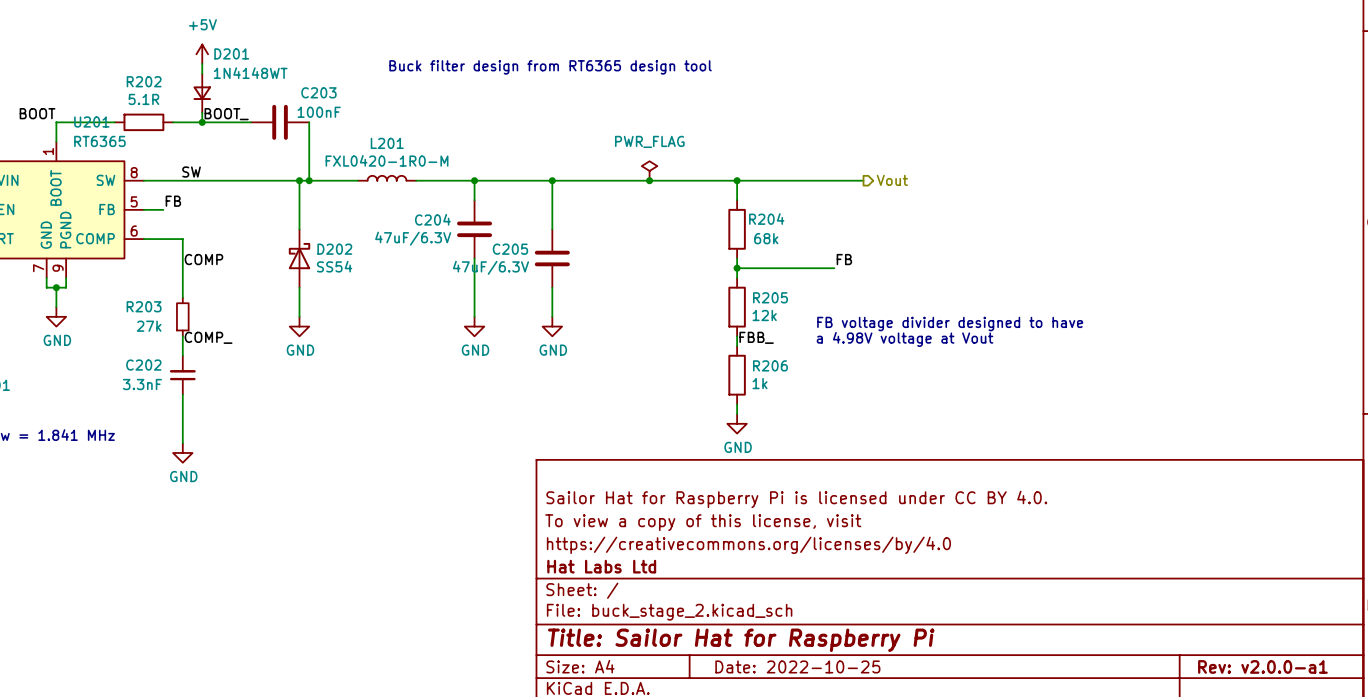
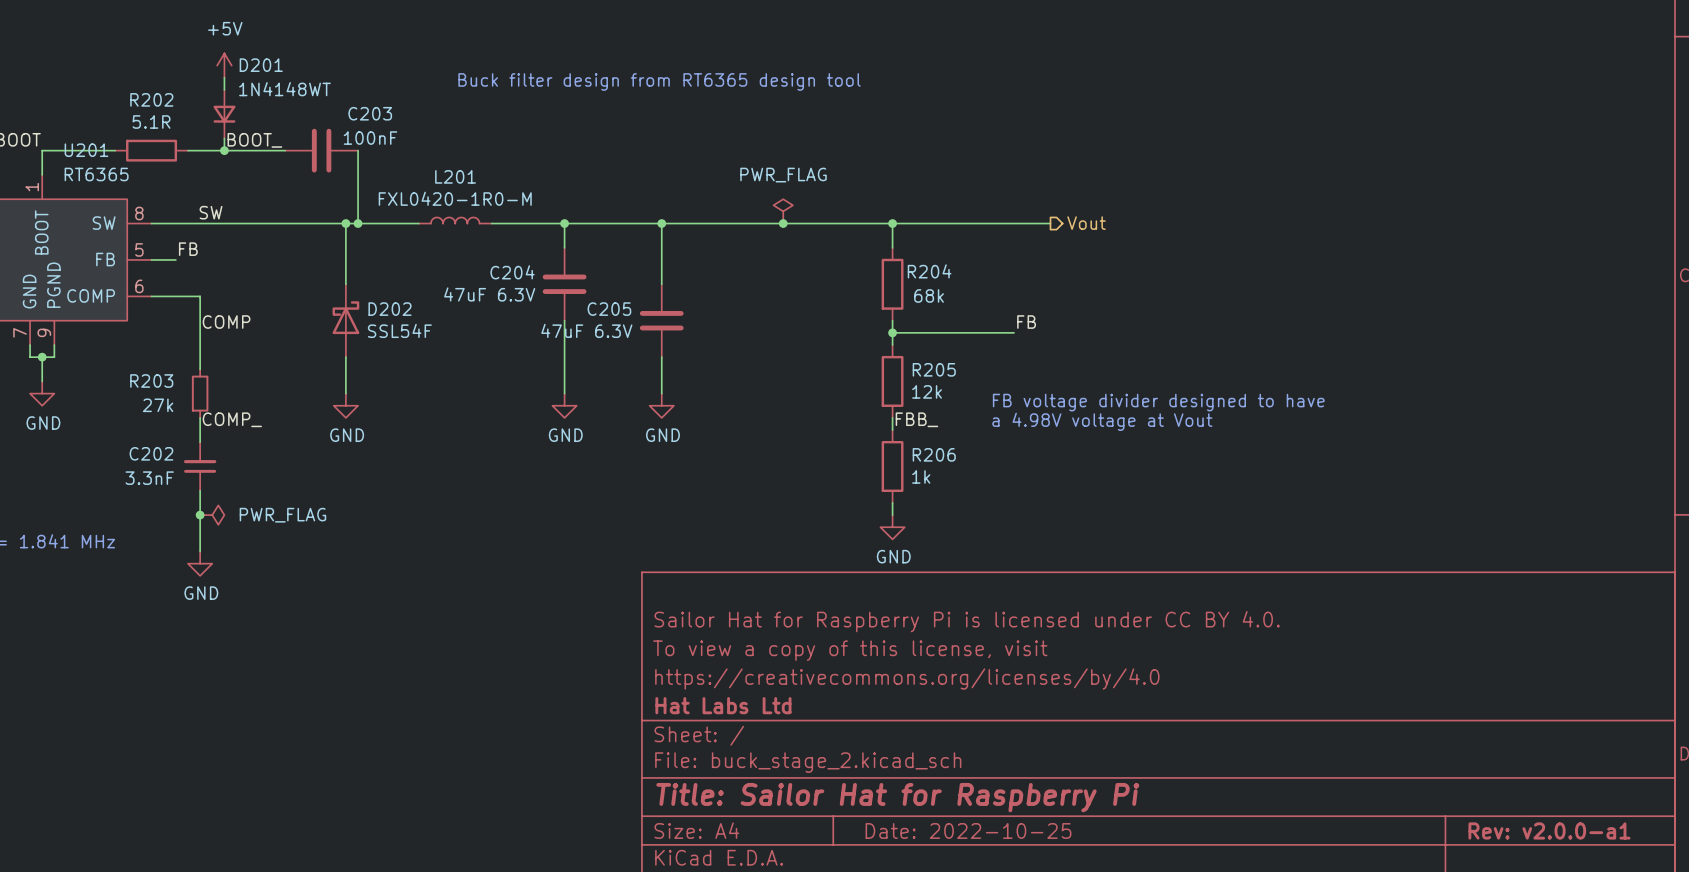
C204 value: 47uF/6.3V (413, 238) -> 47uF 6.3V (489, 294)
D202 value: SS54 (334, 266) -> SSL54F (399, 330)
C205 value: 47uF/6.3V (490, 267) -> 47uF 6.3V (586, 330)
junction: none -> (200, 515)
power symbol: none -> PWR_FLAG (212, 515)

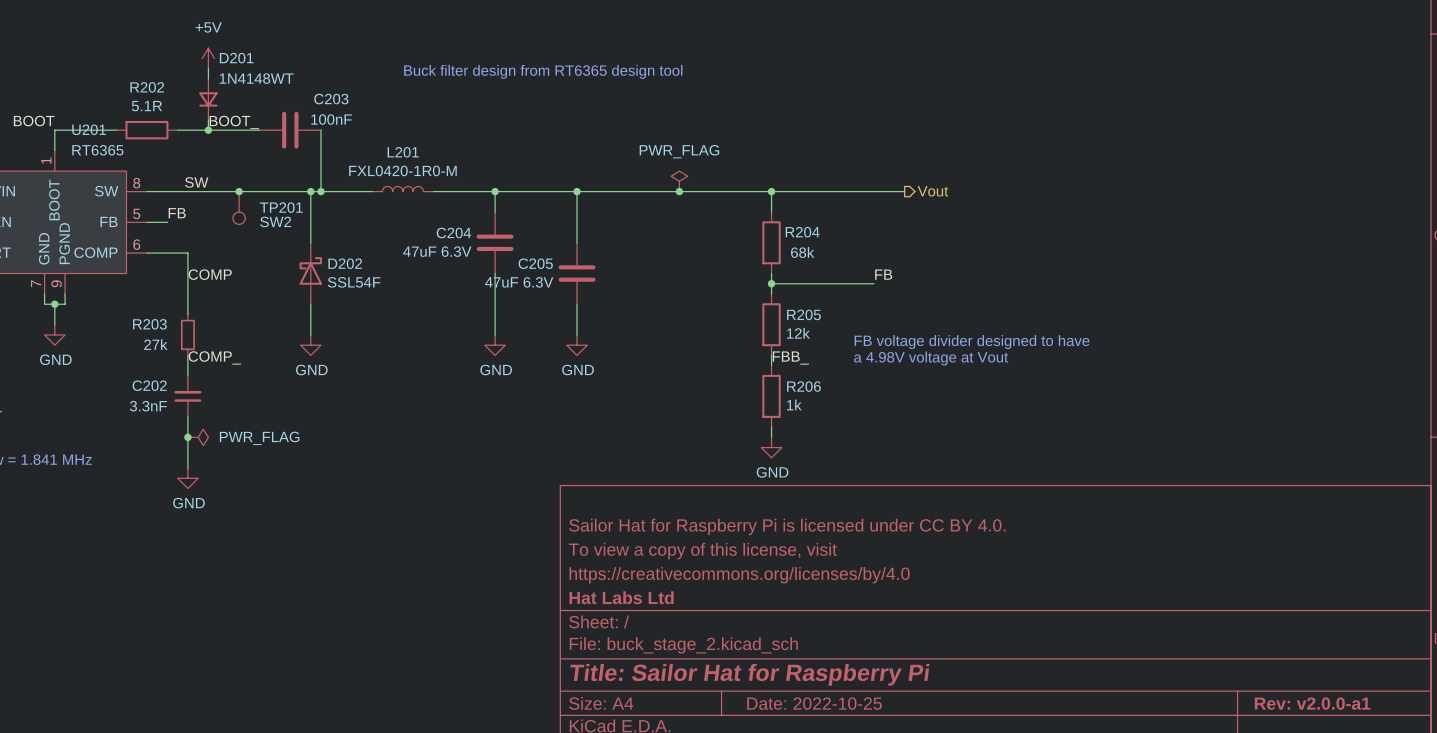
junction: none -> (239, 191)
TP201: none -> SW2 (239, 207)

